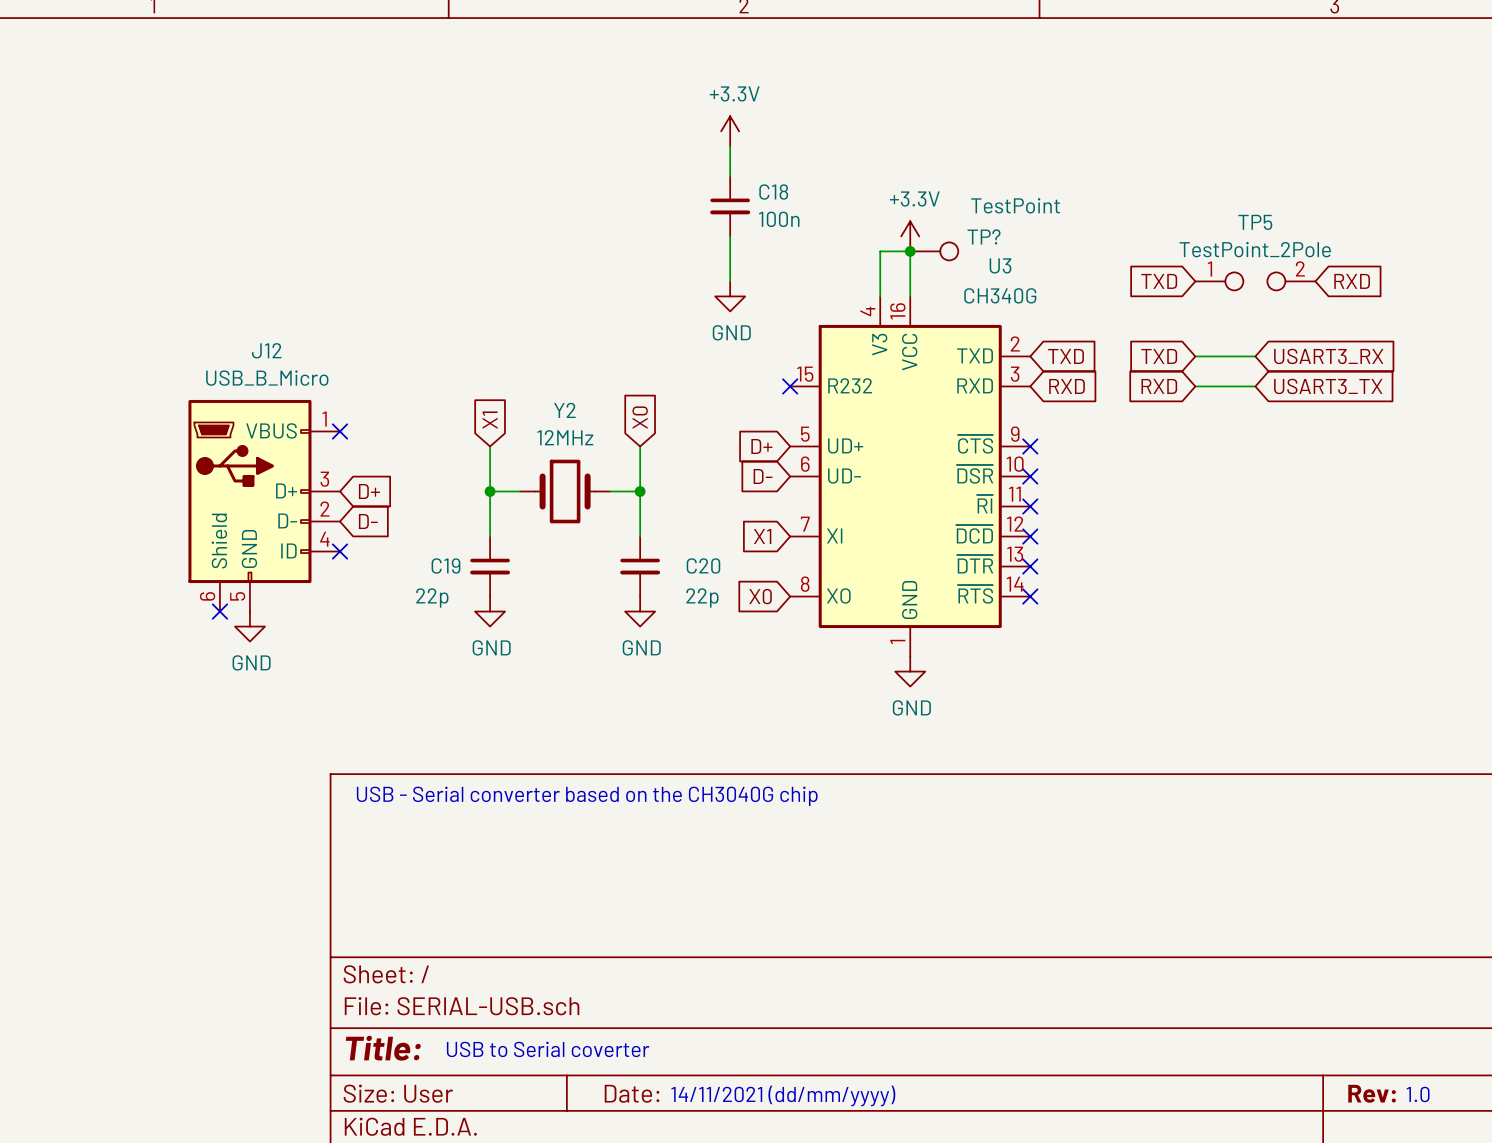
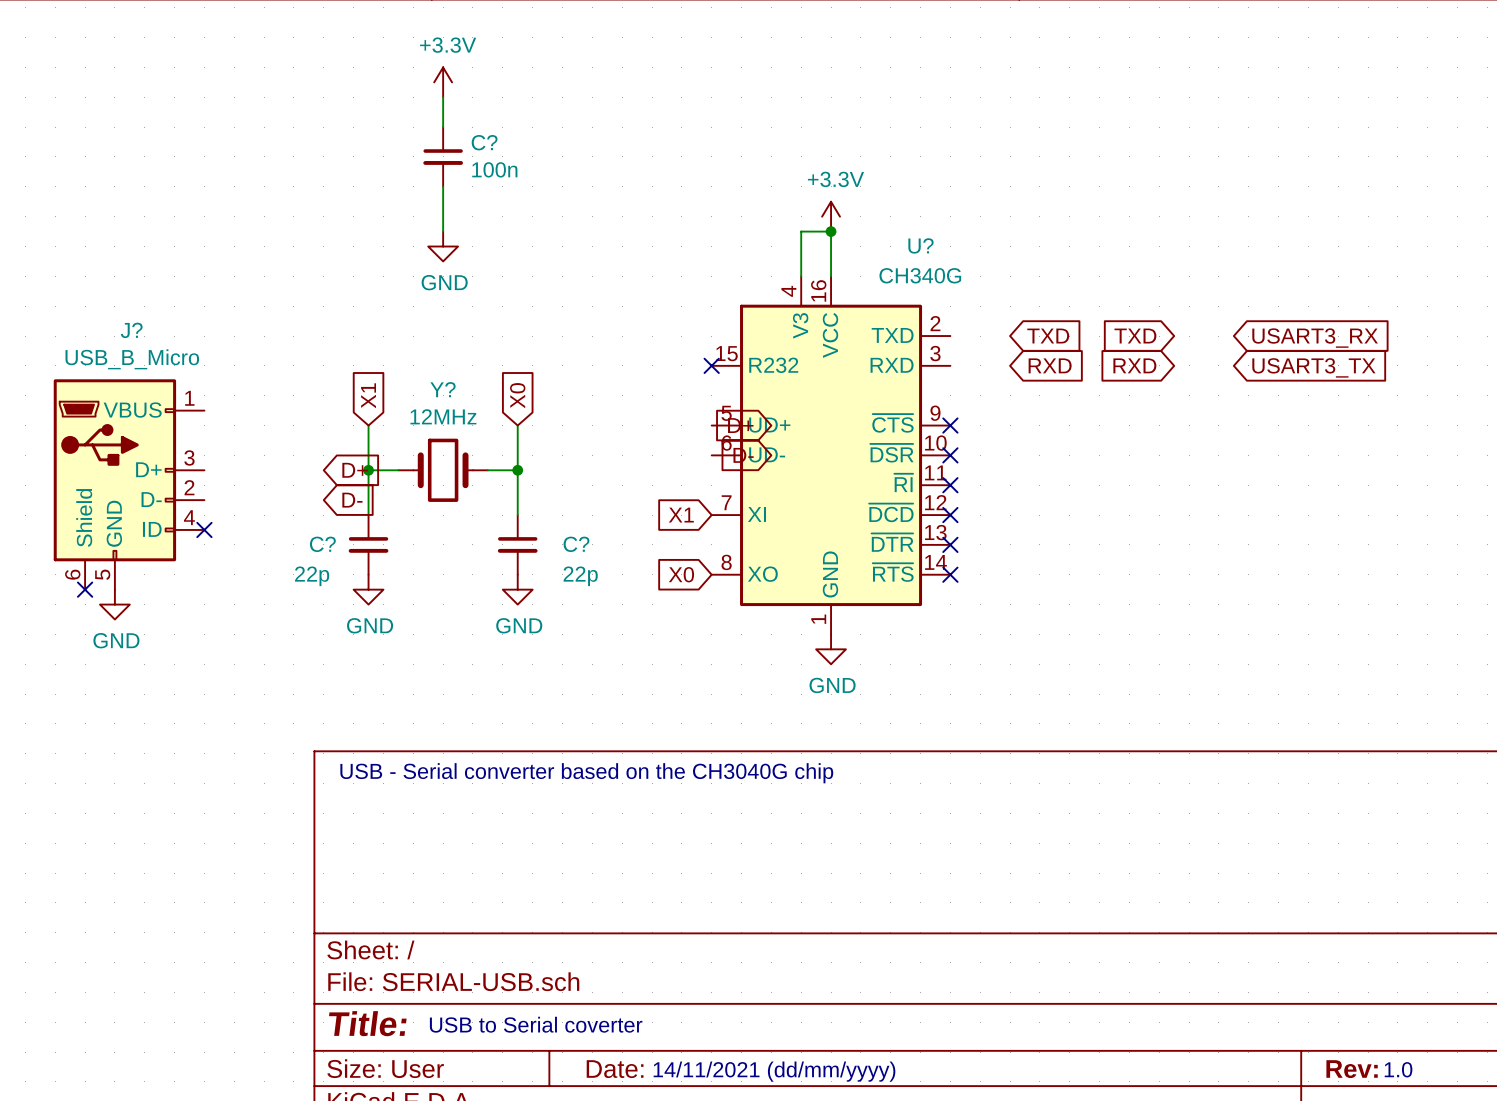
power symbol: none -> +3.3V (443, 82)
power symbol: +3.3V (730, 131) -> none
wire: (730, 146) (730, 176) -> (443, 97) (443, 127)
C?: none -> 100n (443, 156)
C18: 100n (730, 206) -> none
wire: (730, 236) (730, 281) -> (443, 186) (443, 231)
power symbol position: +3.3V (910, 236) -> +3.3V (831, 216)
junction position: (910, 251) -> (831, 231)
TP?: TestPoint (934, 251) -> none
power symbol: none -> GND (443, 246)
global label: TXD (1159, 281) -> none
TP5: TestPoint_2Pole (1255, 281) -> none
global label: RXD (1352, 281) -> none
power symbol: GND (730, 296) -> none
wire: (880, 296) (880, 251) (910, 251) (910, 296) -> (801, 276) (801, 231) (831, 231) (831, 276)
wire: (1195, 356) (1255, 356) -> none
no-connect mark position: (790, 386) -> (711, 365)
wire: (1195, 386) (1255, 386) -> none
global label: none -> X0 (517, 395)
global label: X0 (640, 417) -> none
global label position: X1 (490, 420) -> X1 (368, 395)
no-connect mark: (340, 431) -> none
wire: (490, 446) (490, 536) -> (368, 425) (368, 515)
wire: (640, 446) (640, 536) -> (517, 425) (517, 515)
no-connect mark: none -> (950, 425)
no-connect mark: (1030, 446) -> none
U?: none -> CH340G (831, 455)
U3: CH340G (910, 476) -> none
no-connect mark: none -> (950, 455)
no-connect mark: (1030, 476) -> none
junction: none -> (368, 470)
Y?: none -> 12MHz (443, 470)
junction position: (490, 491) -> (517, 470)
Y2: 12MHz (565, 491) -> none
wire: (610, 491) (640, 491) -> (368, 470) (398, 470)
junction: (640, 491) -> none
J?: none -> USB_B_Micro (129, 484)
J12: USB_B_Micro (264, 505) -> none
no-connect mark: none -> (950, 485)
no-connect mark: (1030, 506) -> none
global label position: X1 (762, 536) -> X1 (681, 515)
no-connect mark: none -> (950, 515)
no-connect mark: (1030, 536) -> none
no-connect mark: none -> (204, 529)
no-connect mark: (340, 551) -> none
C?: none -> 22p (368, 544)
C19: 22p (490, 566) -> none
C?: none -> 22p (517, 544)
C20: 22p (640, 566) -> none
no-connect mark: none -> (950, 544)
no-connect mark: (1030, 566) -> none
global label position: X0 (760, 596) -> X0 (681, 574)
no-connect mark: none -> (950, 574)
no-connect mark: (1030, 596) -> none
no-connect mark: none -> (85, 589)
no-connect mark: (219, 611) -> none
power symbol: none -> GND (368, 589)
power symbol position: GND (490, 611) -> GND (517, 589)
power symbol: GND (640, 611) -> none
power symbol: none -> GND (114, 604)
power symbol: GND (249, 626) -> none
power symbol position: GND (910, 671) -> GND (831, 649)

